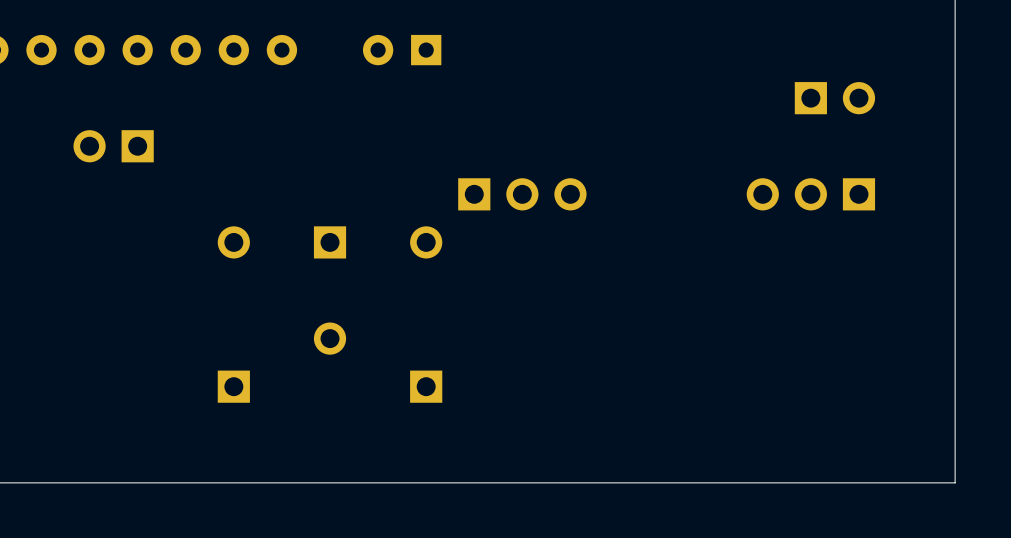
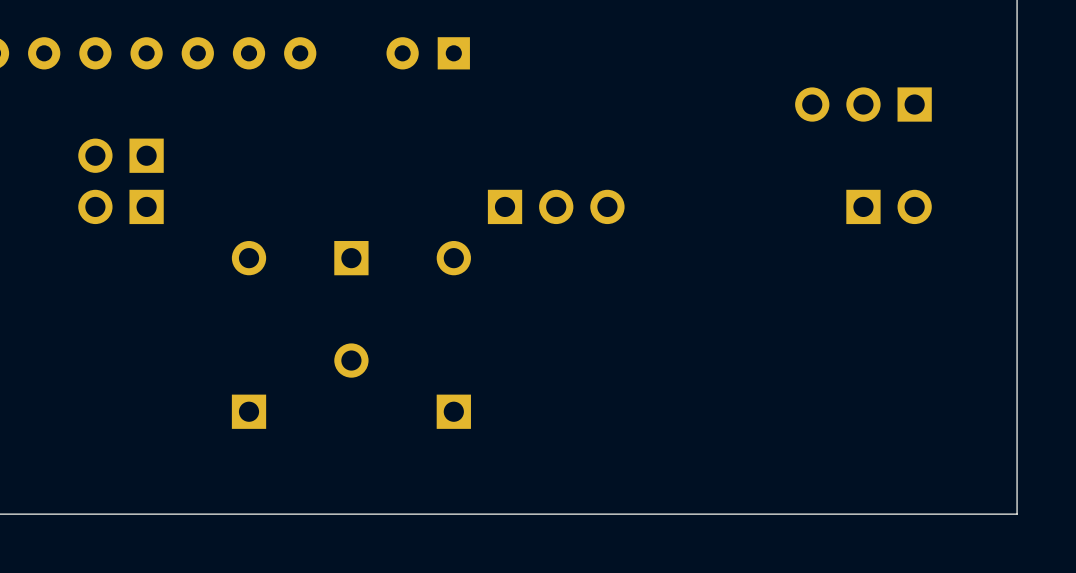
part position: (834, 98) -> (889, 206)
part: none -> (121, 206)
part position: (810, 194) -> (863, 104)

